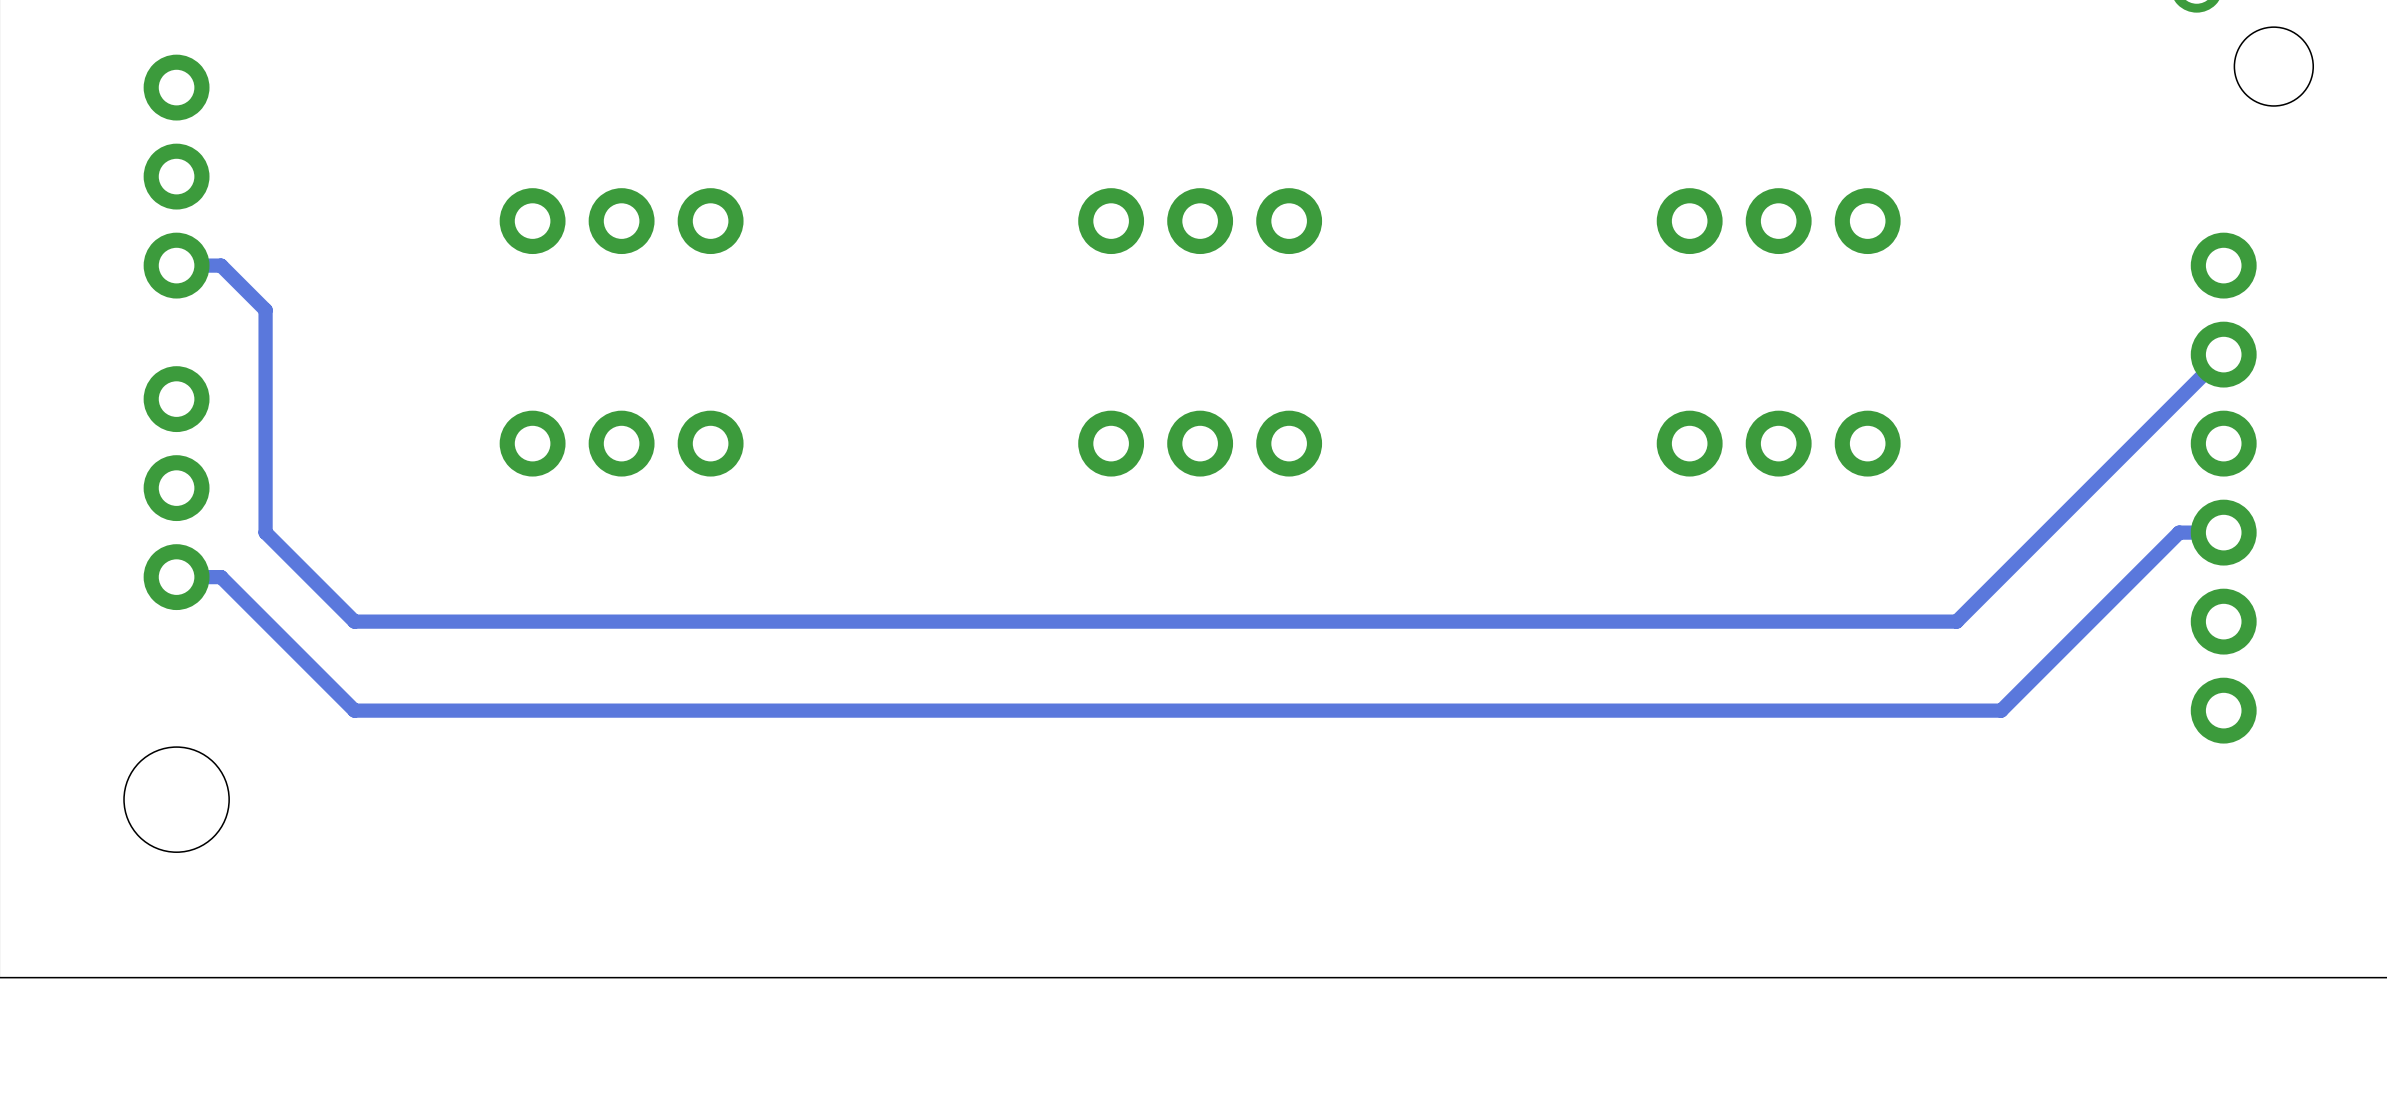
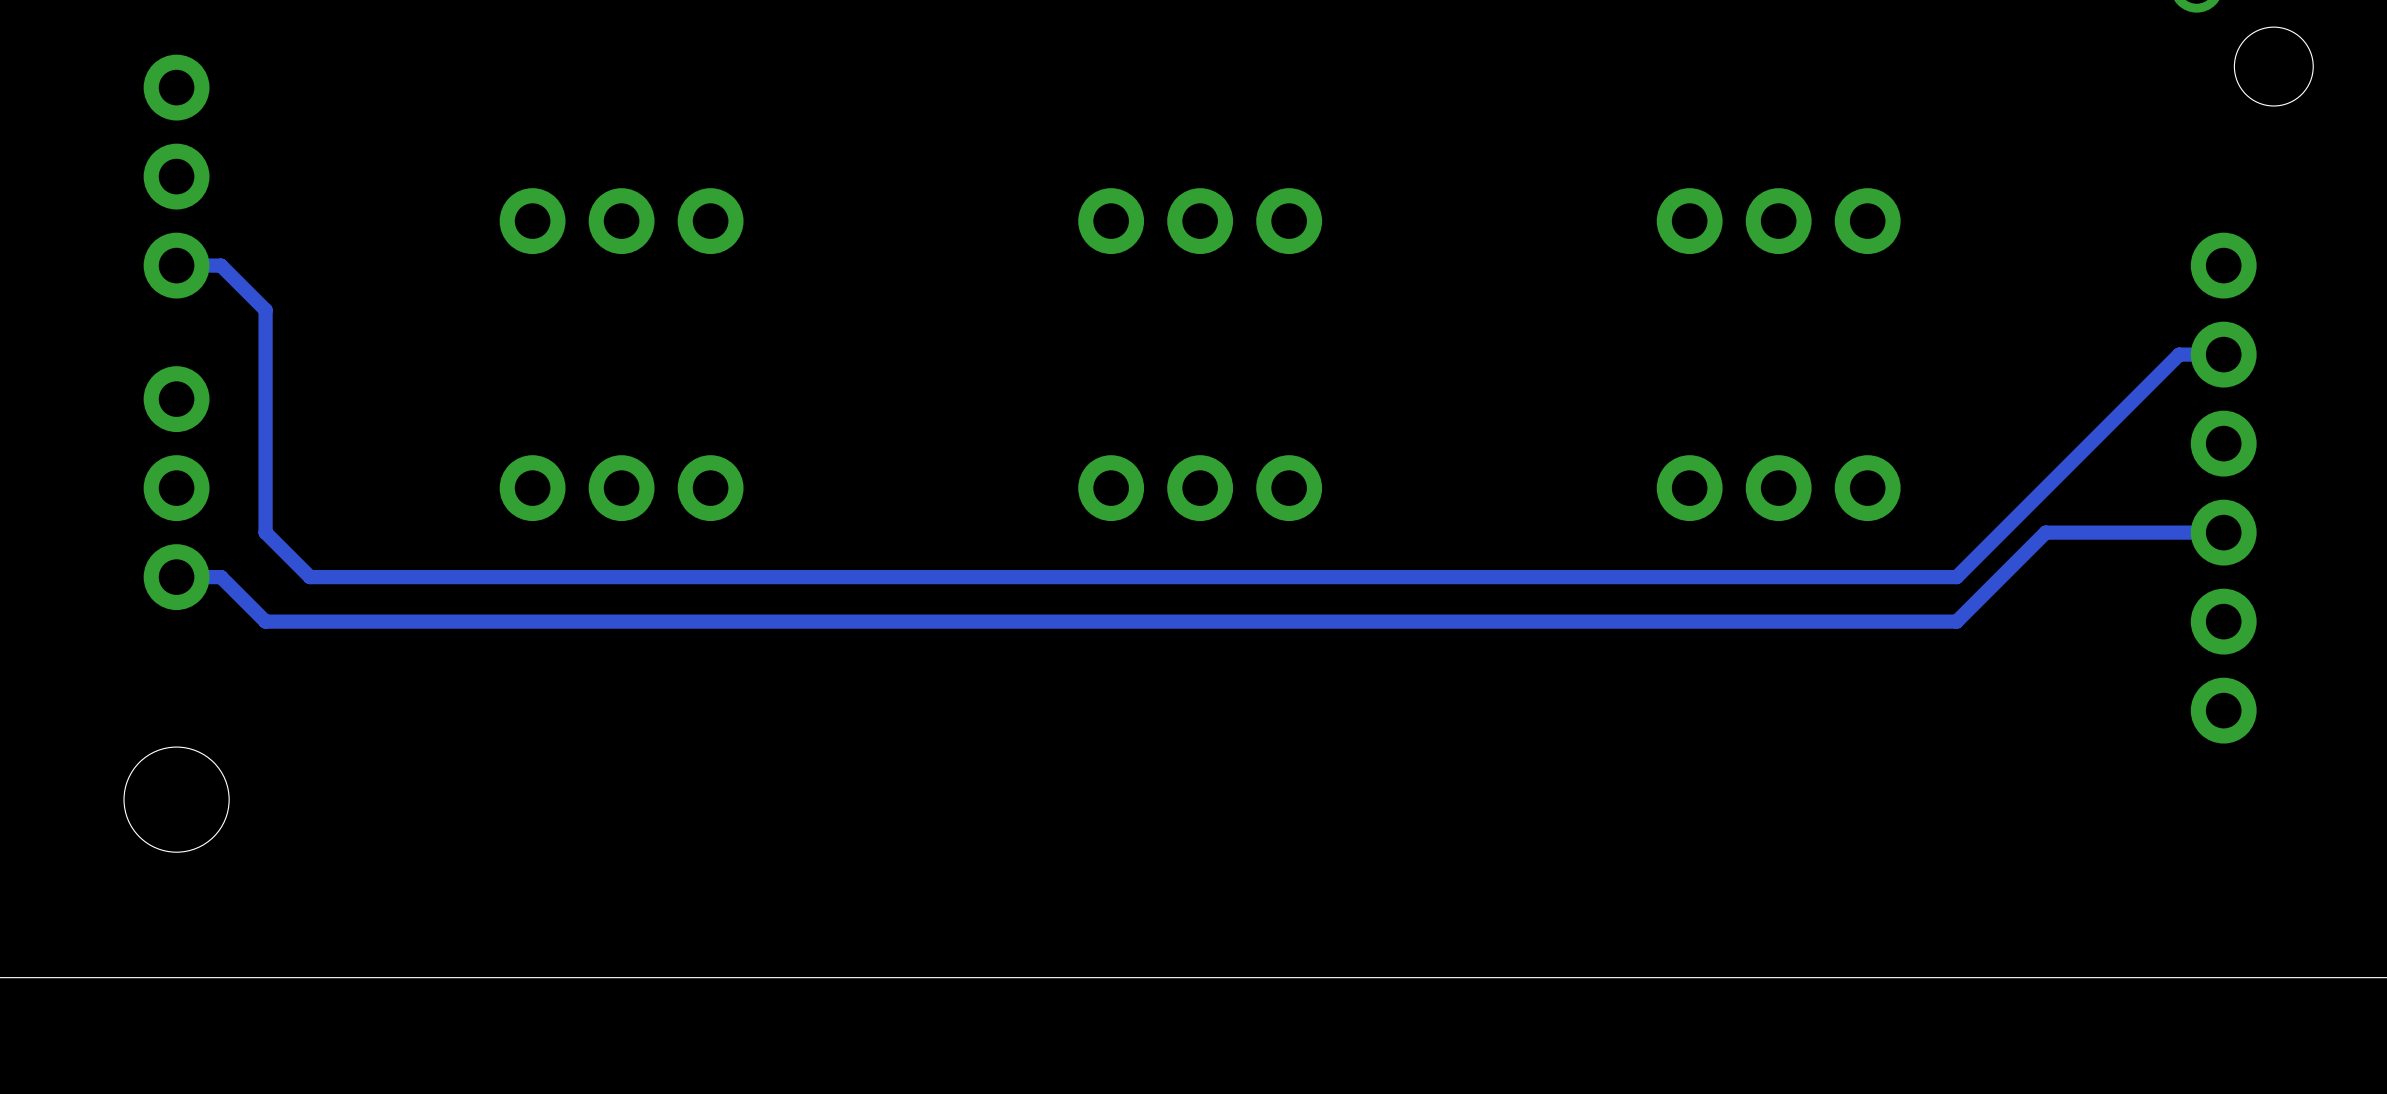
track: (2223, 354) (2045, 532) -> (2179, 532) (2045, 532)
track: none -> (2223, 354) (2179, 354) (1956, 577) (310, 577)
part position: (621, 443) -> (621, 488)
part position: (1200, 443) -> (1200, 488)
part position: (1778, 443) -> (1778, 488)
track: (2179, 532) (2001, 710) (354, 710) (265, 621) -> none
track: (310, 577) (354, 621) -> (265, 621) (354, 621)

